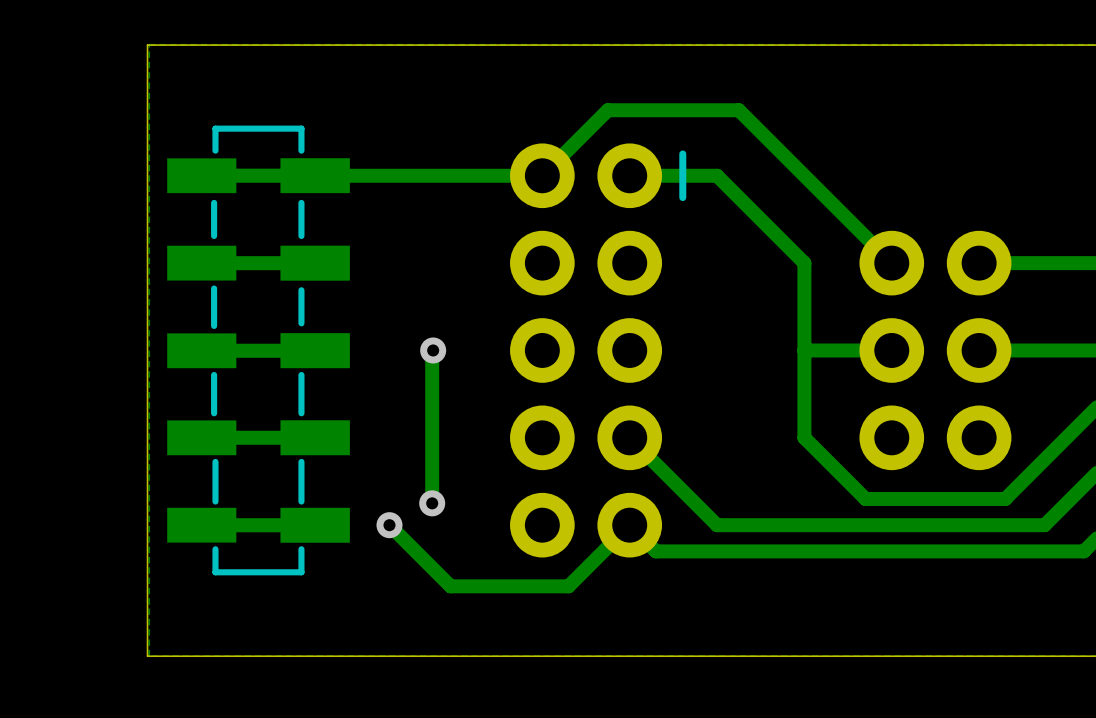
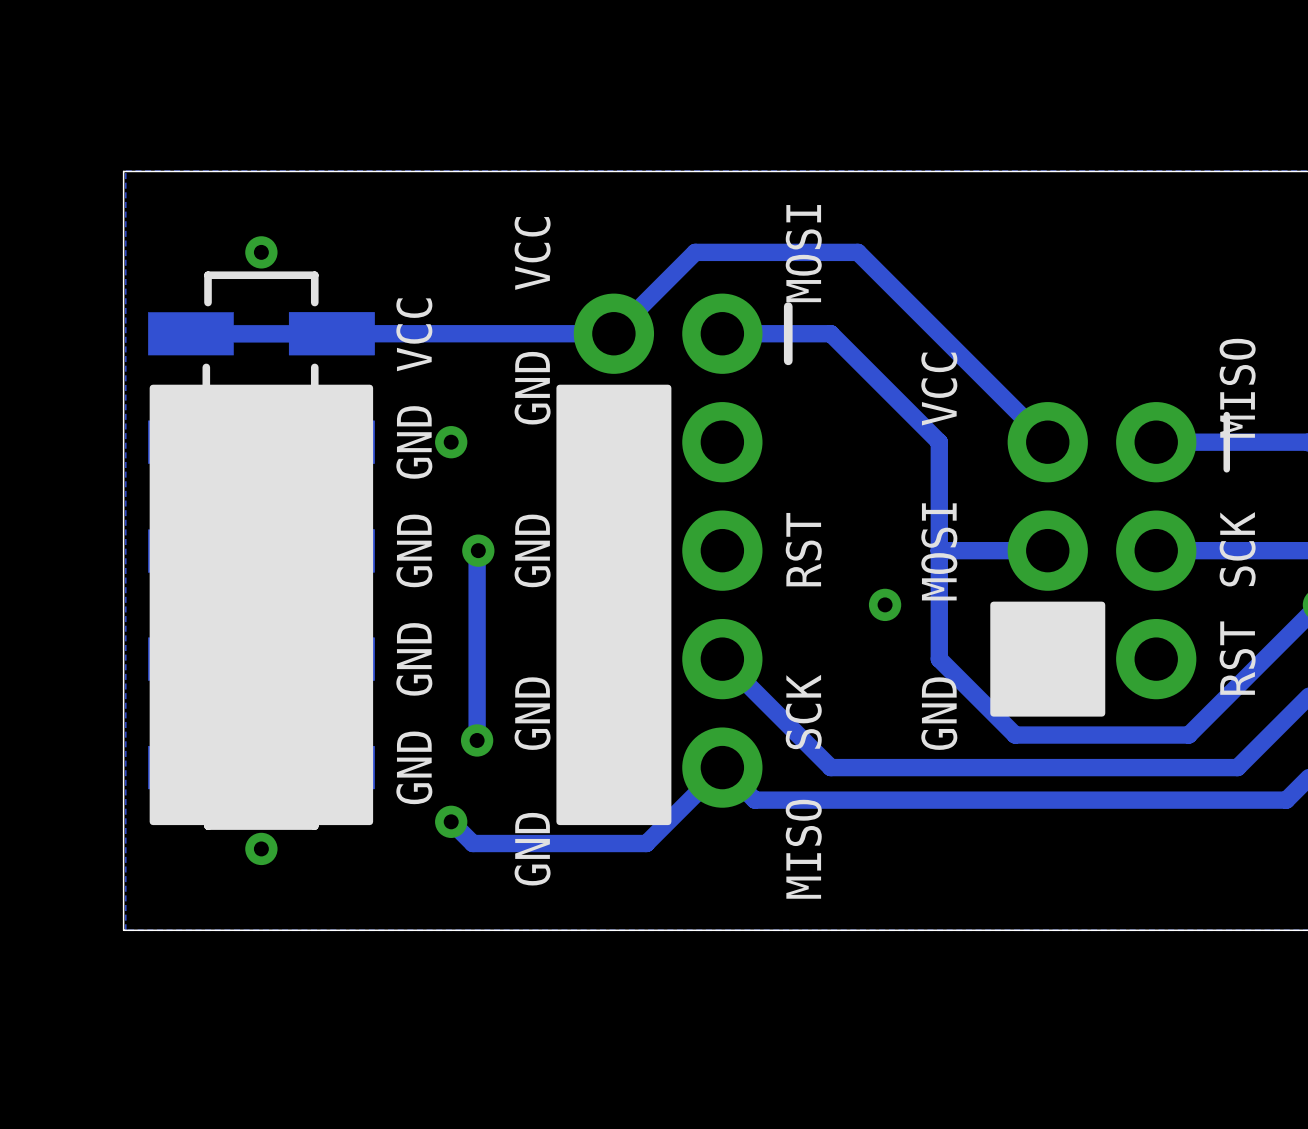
via: none -> (261, 252)
text: none -> MOSI (803, 253)
text: none -> VCC (532, 253)
text: none -> VCC (414, 334)
drawing: none -> [149, 384, 374, 826]
drawing: none -> [556, 384, 672, 826]
text: none -> MISO (1237, 388)
text: none -> GND (532, 388)
text: none -> VCC (939, 389)
line: none -> (1226, 415) (1226, 469)
text: none -> GND (414, 442)
via: none -> (451, 442)
text: none -> RST (803, 549)
text: none -> GND (414, 550)
text: none -> GND (532, 550)
text: none -> MOSI (939, 551)
text: none -> SCK (1237, 549)
drawing: none -> [990, 601, 1106, 717]
via: none -> (885, 604)
text: none -> RST (1237, 658)
text: none -> GND (414, 659)
text: none -> GND (532, 713)
text: none -> SCK (803, 711)
text: none -> GND (939, 713)
text: none -> GND (414, 767)
track: (389, 525) (450, 586) -> (451, 821) (472, 843) (500, 843)
via position: (389, 525) -> (451, 821)
via: none -> (261, 848)
text: none -> GND (532, 849)
text: none -> MISO (803, 849)

